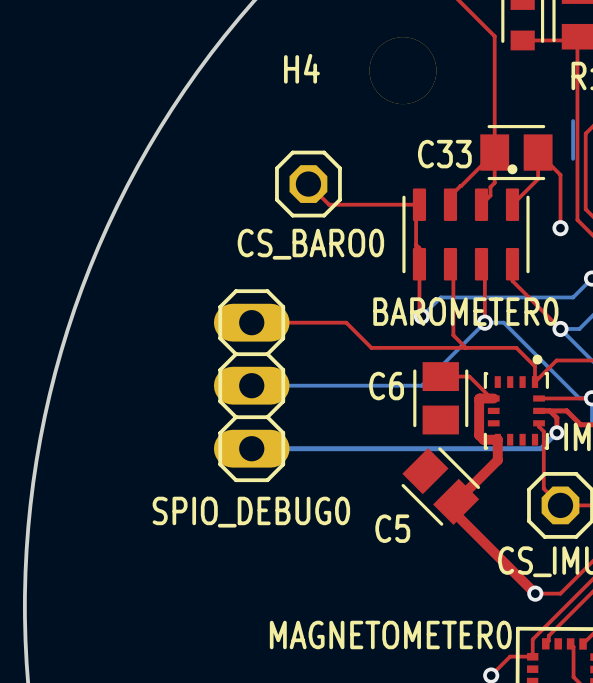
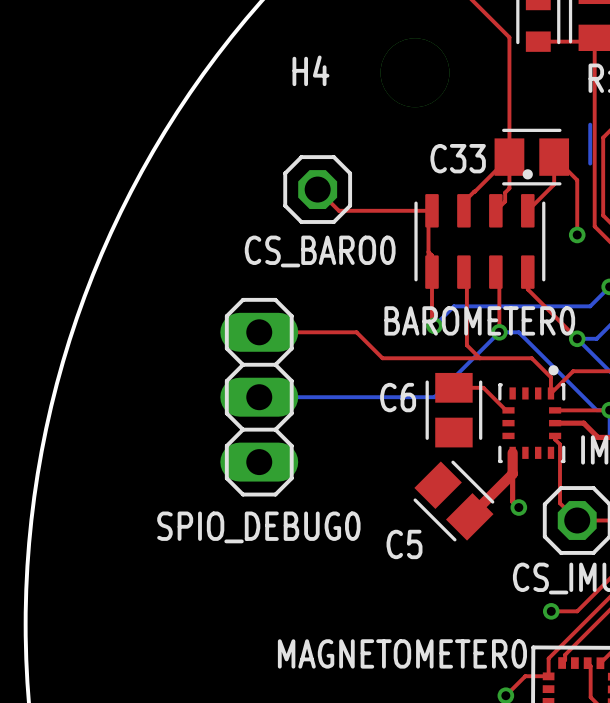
top track: (493, 398) (479, 399) (479, 435) (483, 439) (497, 439) -> none
top track: (539, 410) (549, 410) (556, 417) (556, 432) -> none
bottom track: (556, 432) (540, 448) (251, 448) -> none
via: (556, 432) -> none
top track: none -> (512, 473) (512, 501) (518, 507)
via: none -> (518, 507)
top track: (456, 501) (456, 514) (535, 593) -> none

